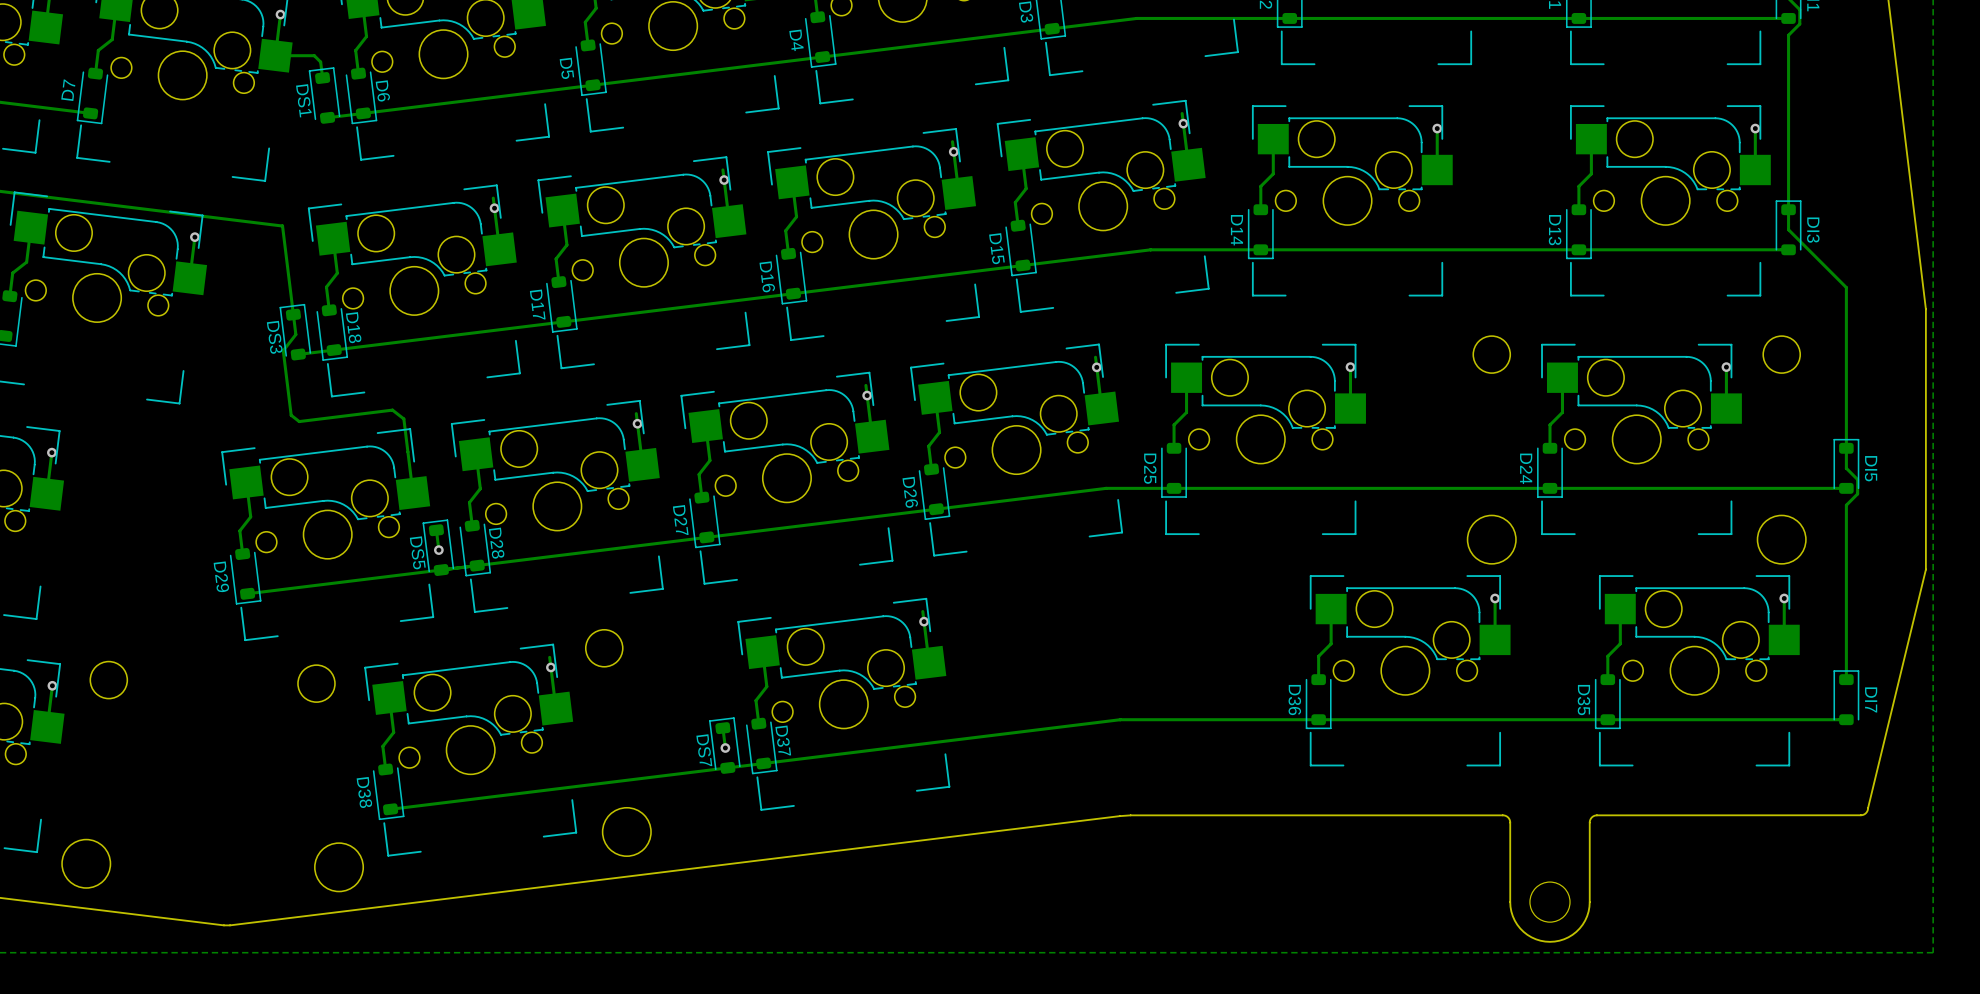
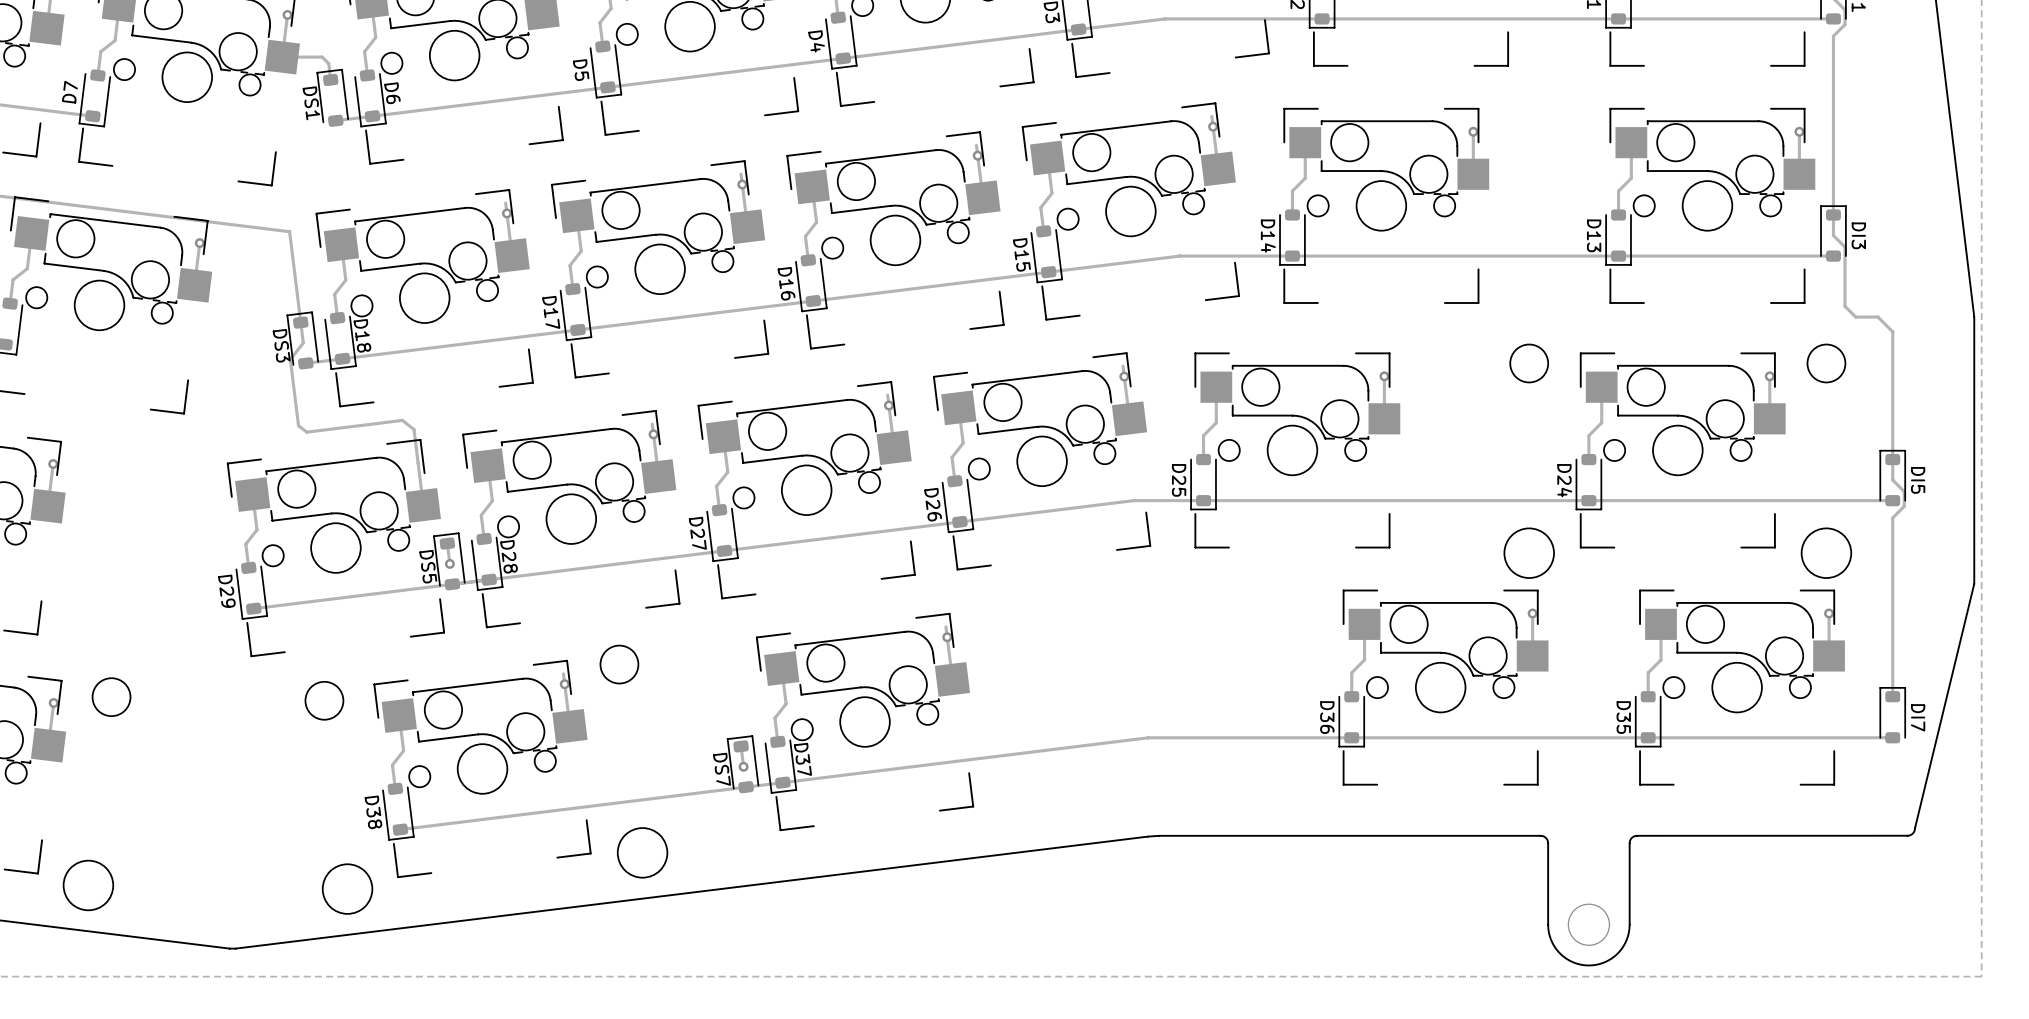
track: (1799, 241) (1846, 287) (1846, 323) -> (1844, 247) (1844, 306) (1855, 317) (1877, 317) (1892, 331)

